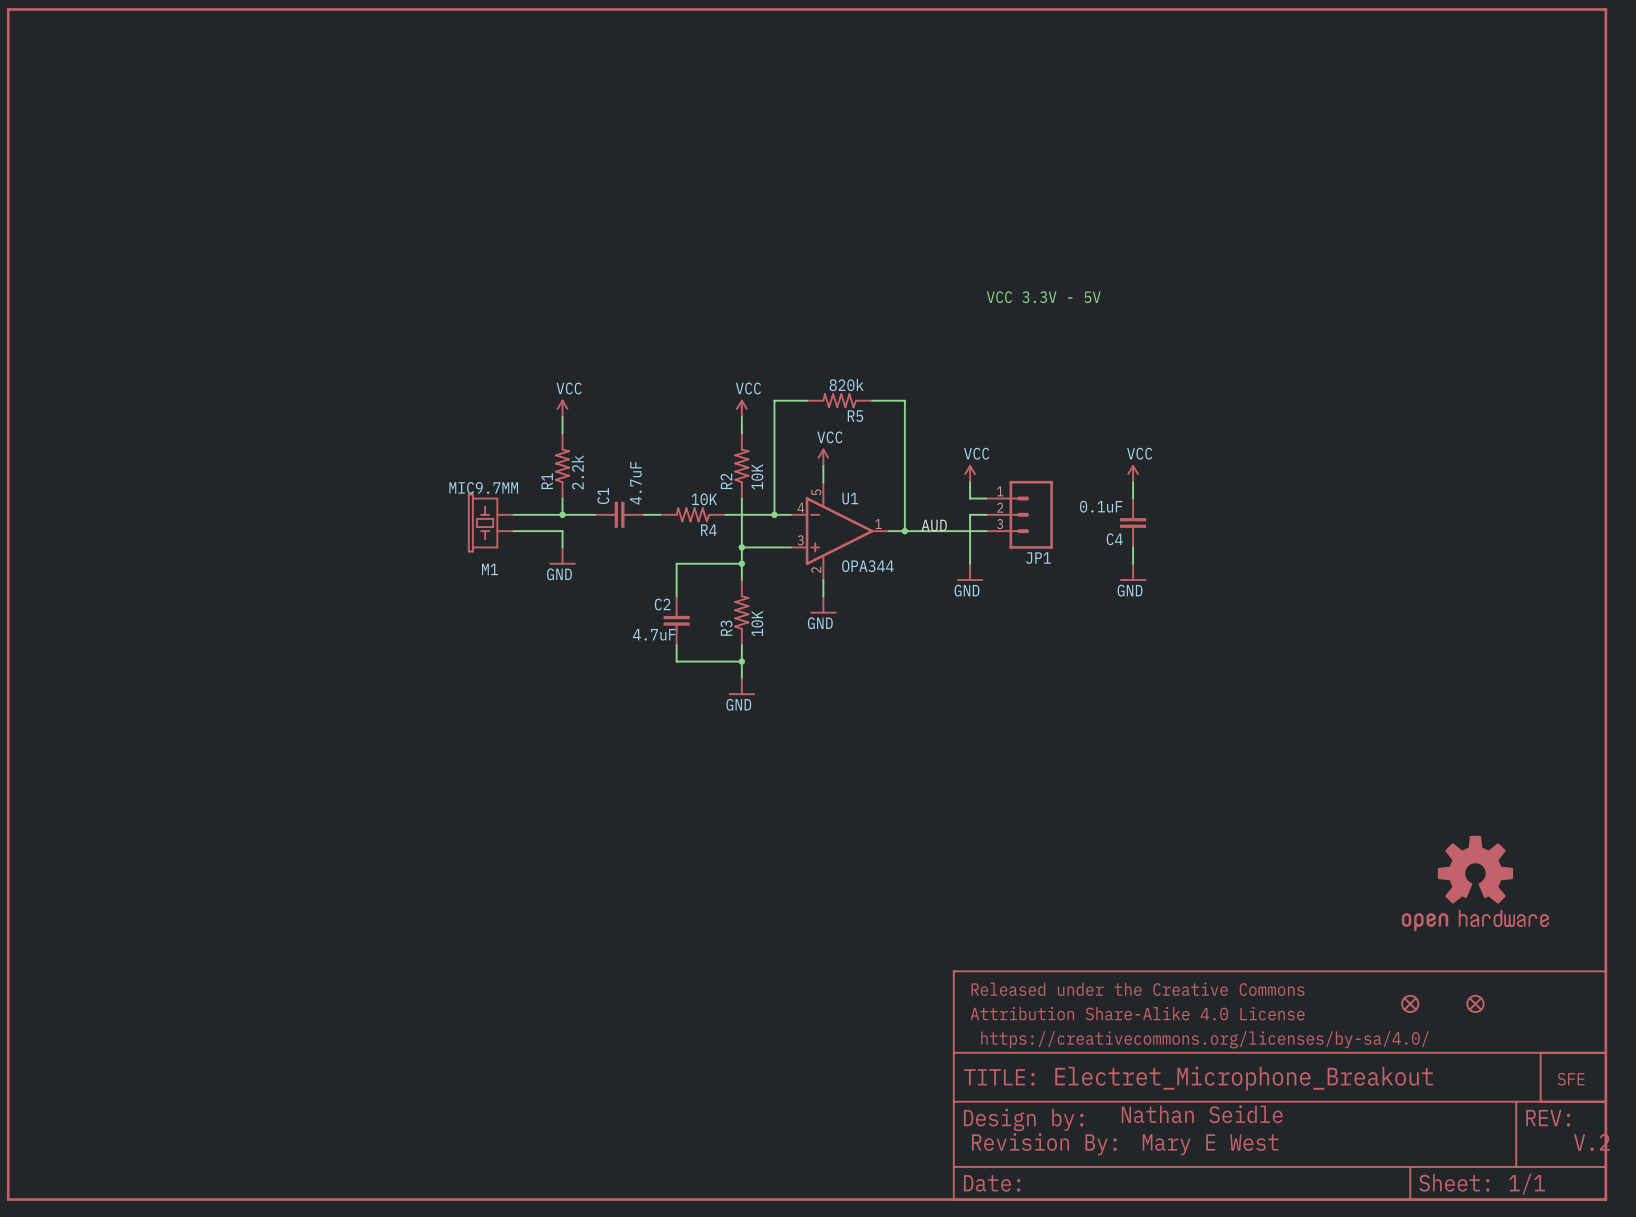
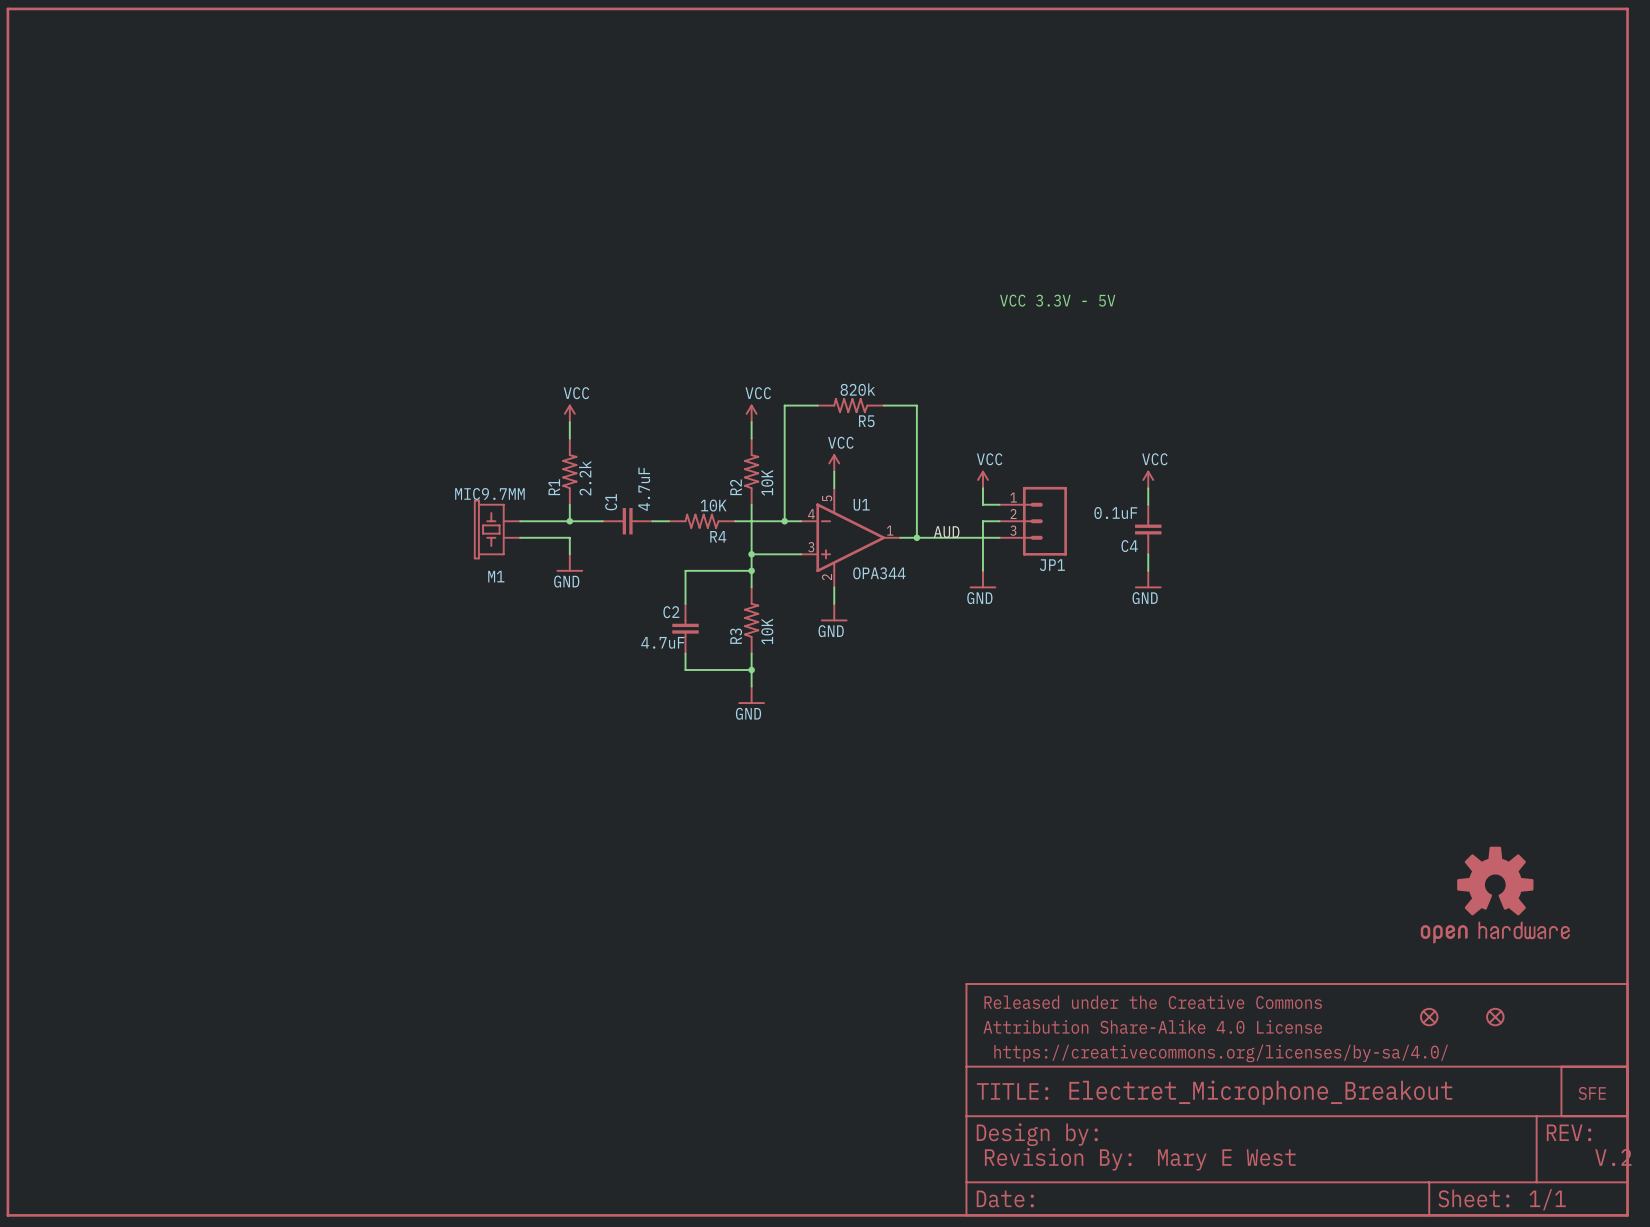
text: Nathan Seidle (1202, 1114) -> none

